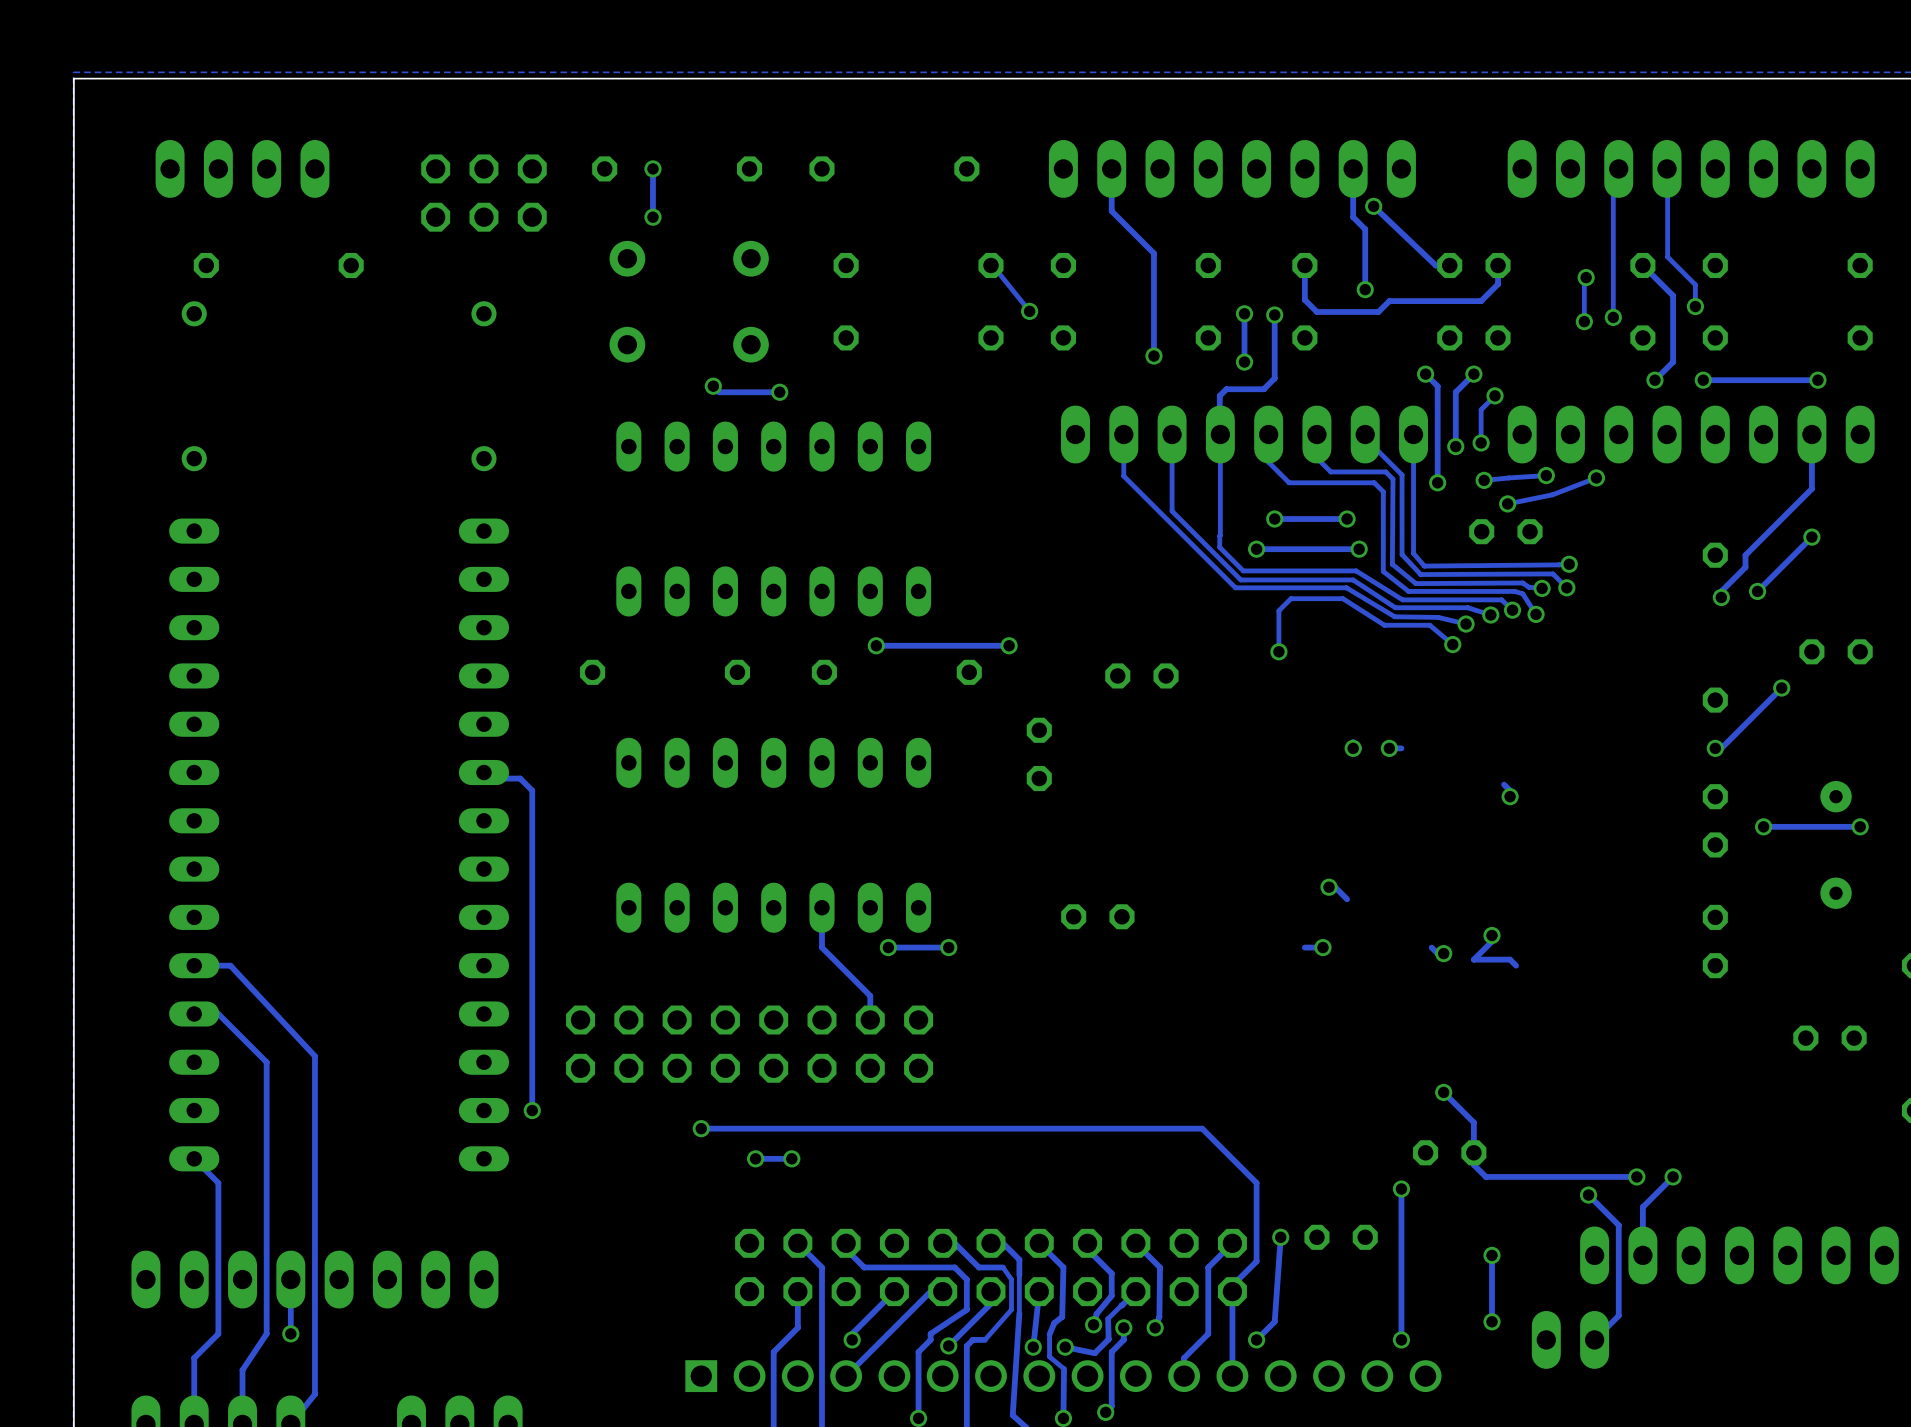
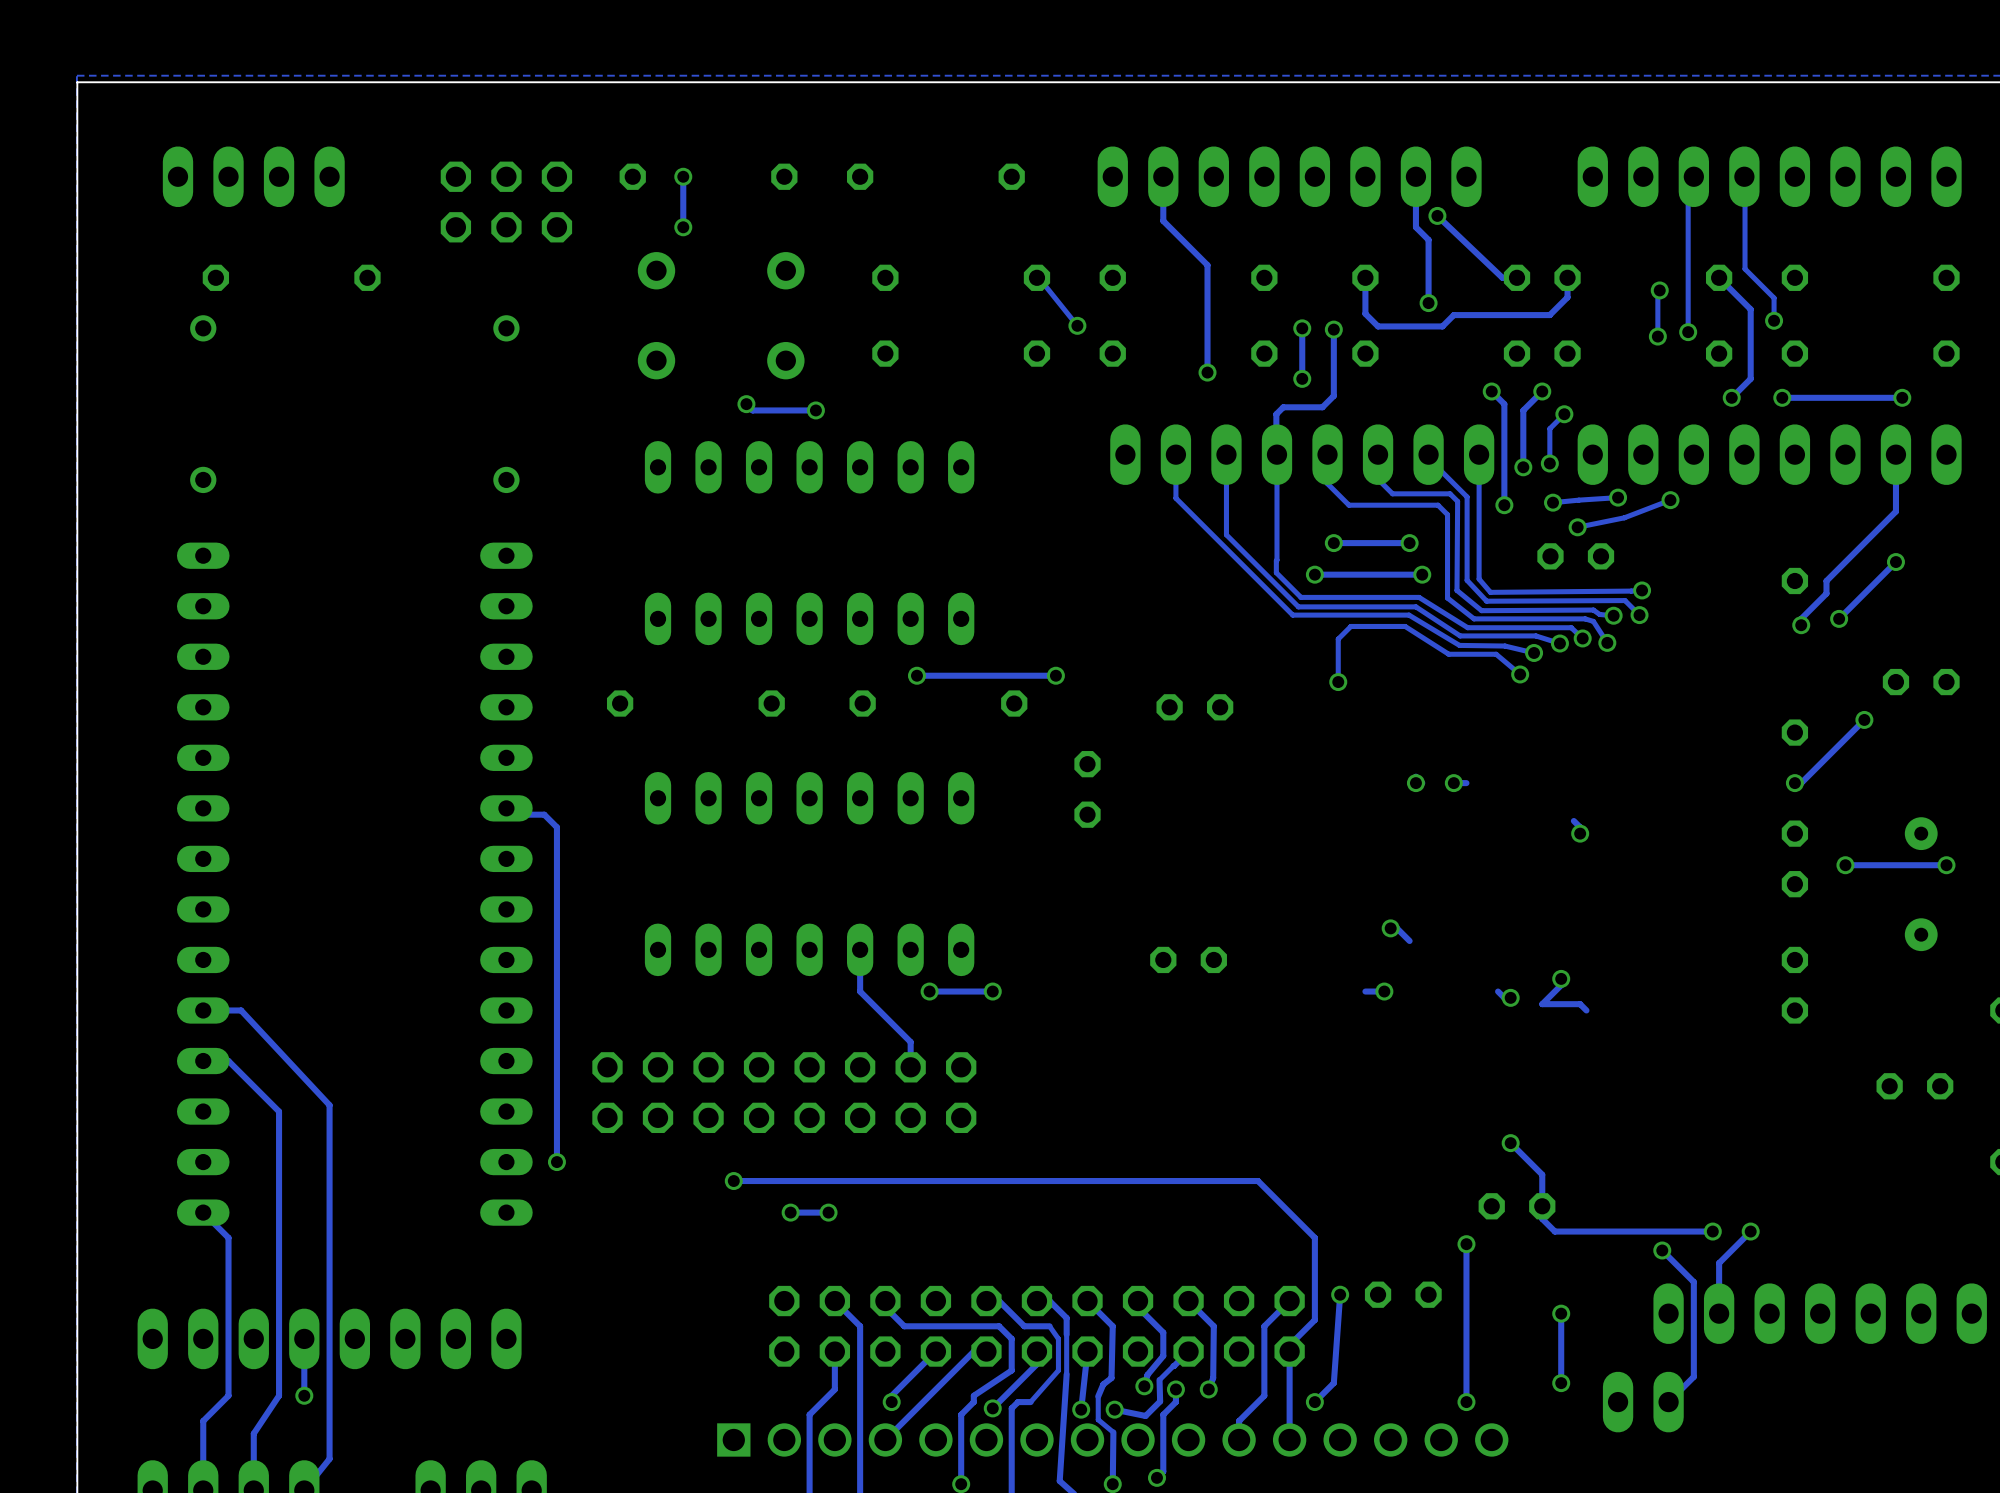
part position: (1097, 916) -> (1188, 959)

